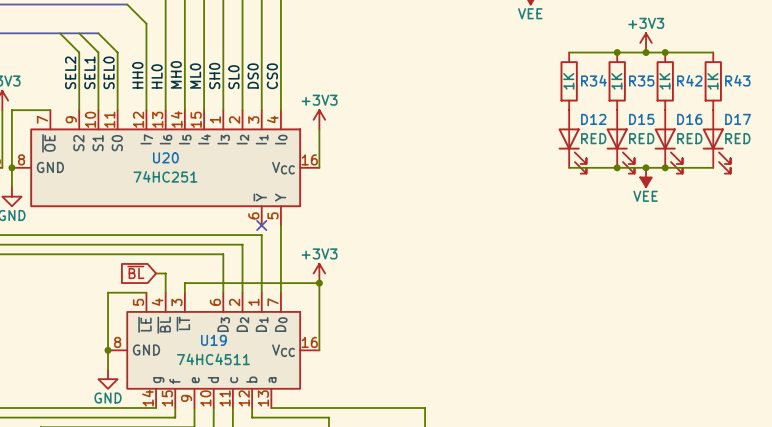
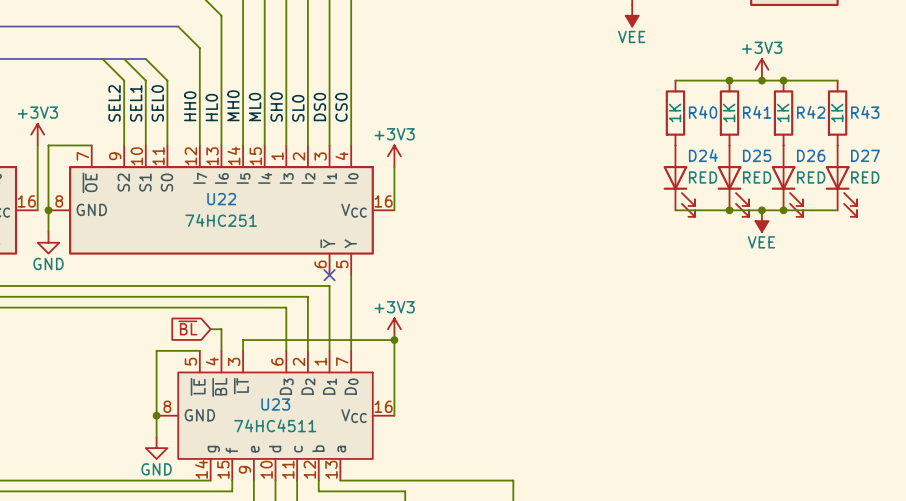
R34 name: R34 (593, 80) -> R40 (703, 112)
R35 name: R35 (641, 81) -> R41 (757, 112)
D12 name: D12 (593, 119) -> D24 (703, 155)
D15 name: D15 (641, 119) -> D25 (757, 155)
D16 name: D16 (689, 119) -> D26 (811, 155)
D17 name: D17 (738, 119) -> D27 (865, 155)
U20 name: U20 (165, 157) -> U22 (221, 199)
U19 name: U19 (213, 340) -> U23 (275, 404)

